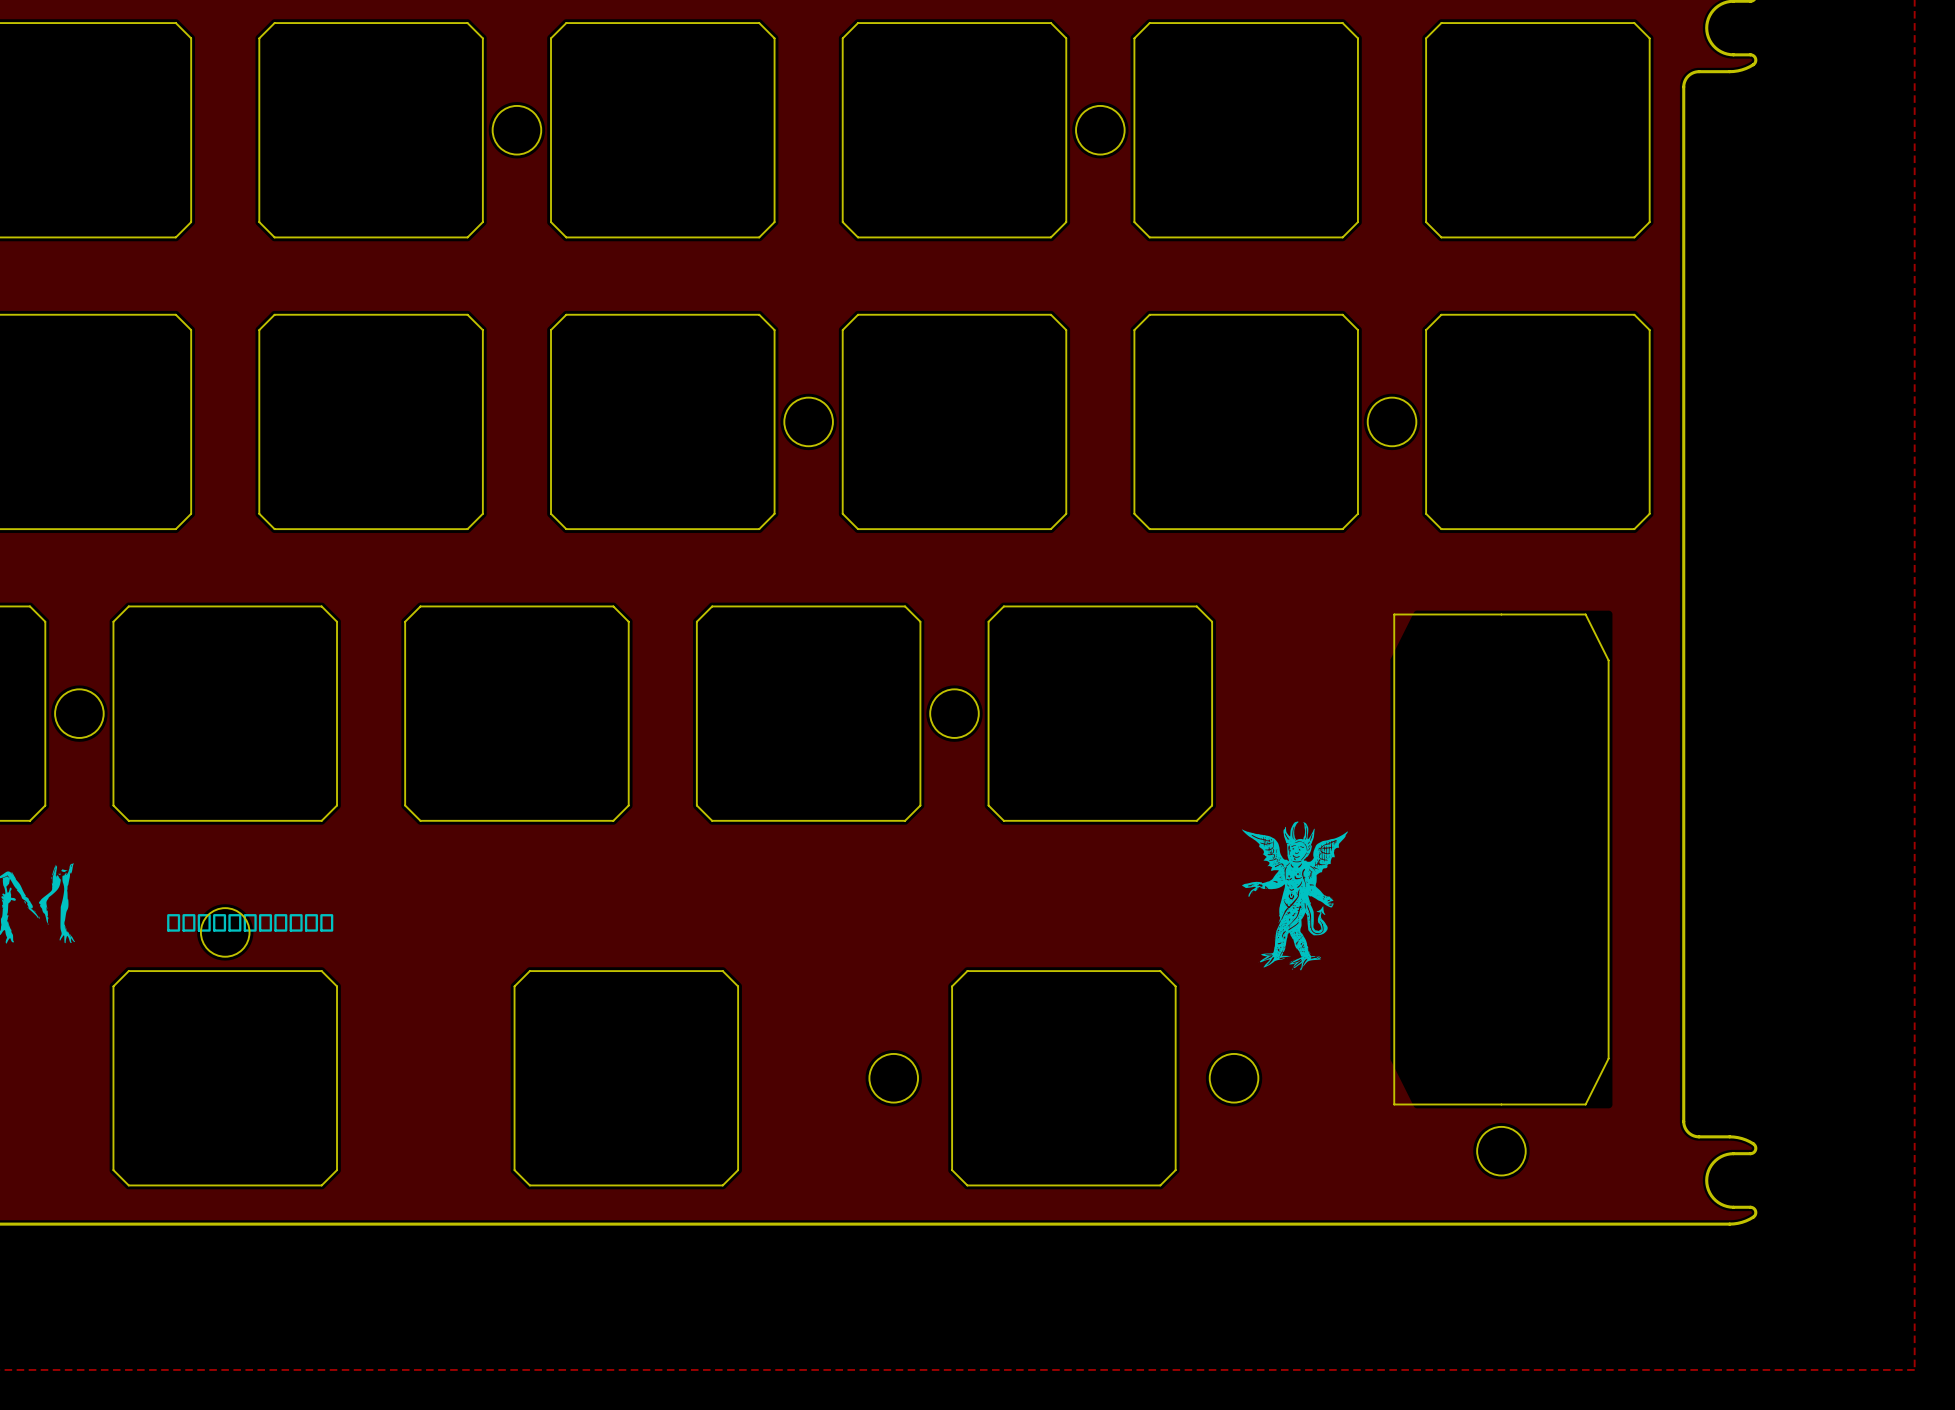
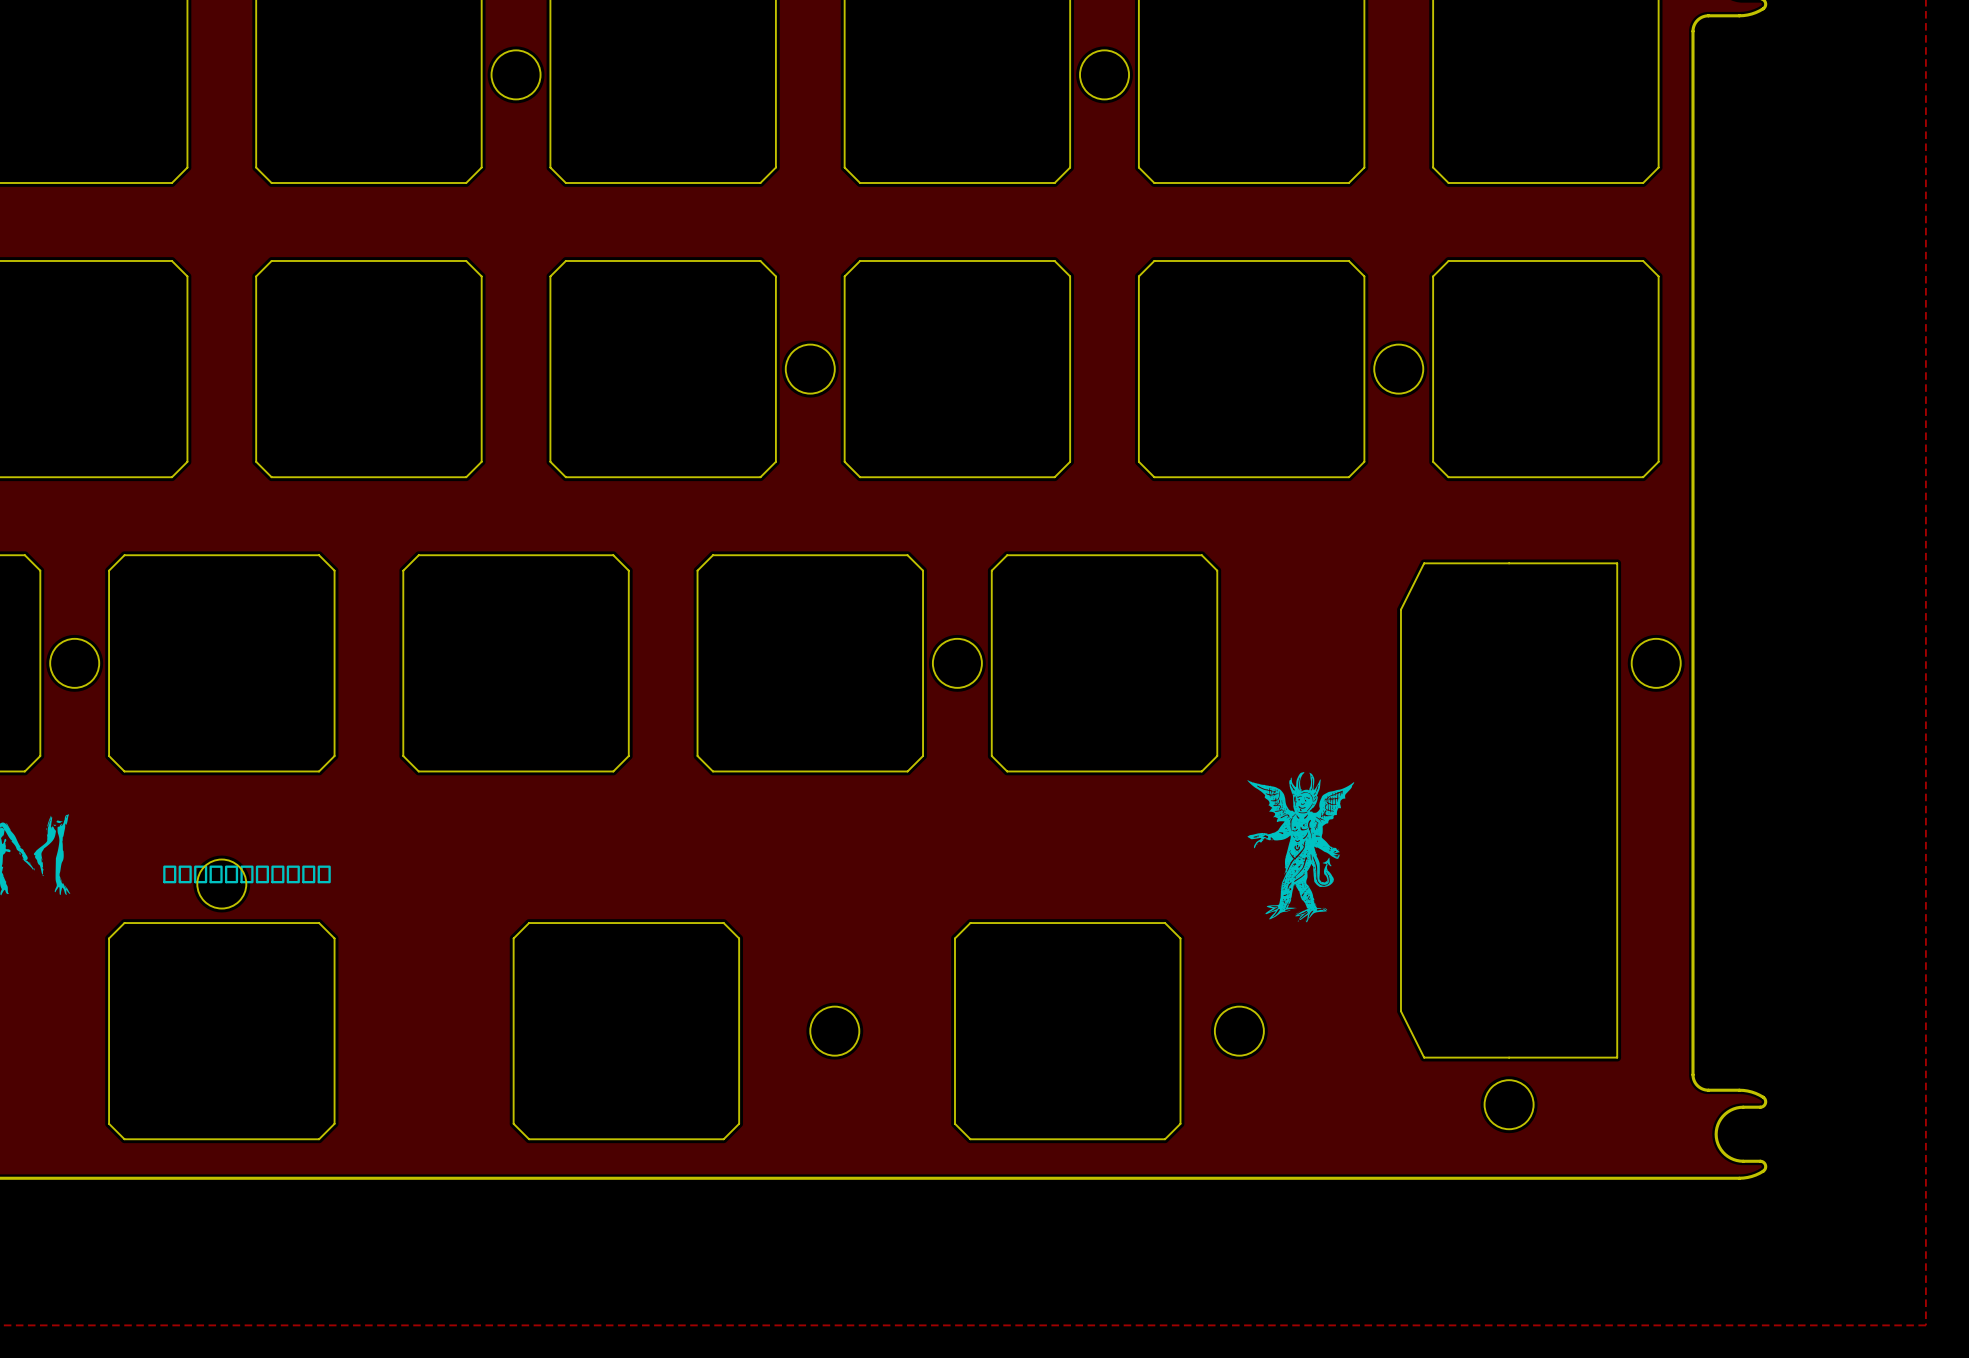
drawing shape: [1393, 613, 1610, 1106] -> [1400, 562, 1619, 1059]
round board edge: none -> [1630, 638, 1682, 689]
round board edge position: (893, 1078) -> (834, 1031)

